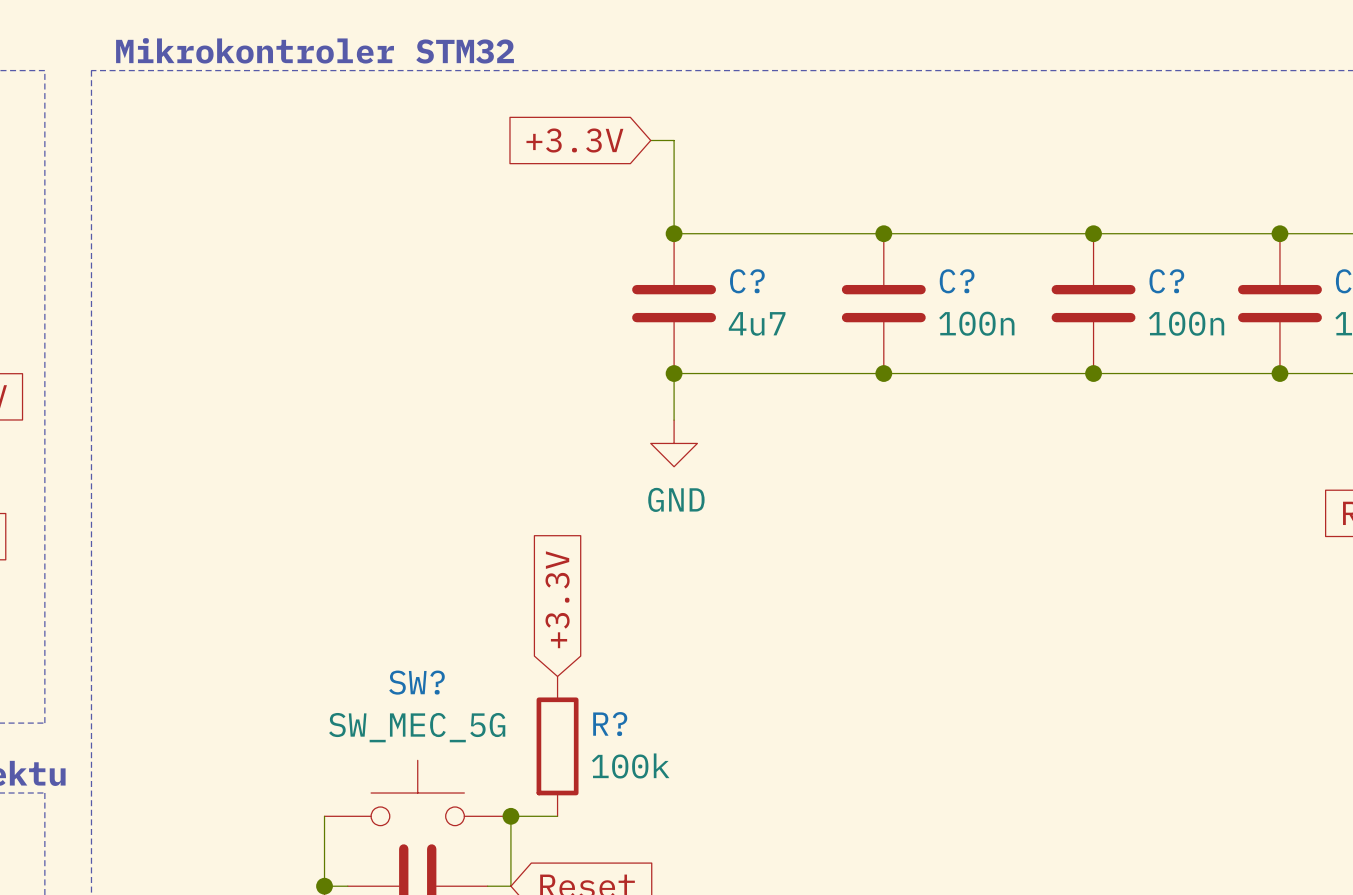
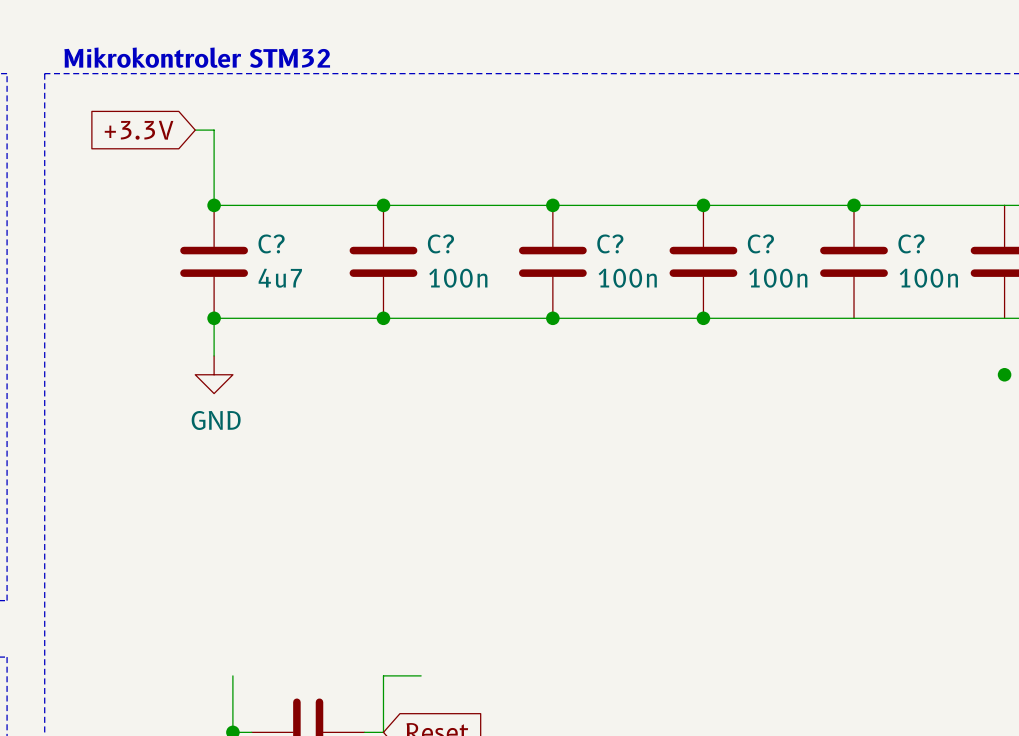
global label: none -> +3.3V (139, 130)
global label: +3.3V (574, 140) -> none
wire: (650, 140) (674, 140) (674, 233) -> (195, 130) (214, 130) (214, 205) (515, 205)
junction: none -> (214, 205)
junction: none -> (383, 205)
junction position: (674, 233) -> (552, 205)
junction position: (883, 233) -> (703, 205)
junction: (1279, 233) -> none
C?: none -> 100n (383, 261)
C? position: (674, 303) -> (214, 261)
C?: none -> 100n (552, 261)
C? position: (883, 303) -> (703, 261)
junction: none -> (214, 318)
junction: none -> (383, 318)
wire: (674, 373) (674, 420) -> (515, 318) (214, 318) (214, 355)
junction position: (674, 373) -> (552, 318)
junction position: (883, 373) -> (703, 318)
junction: (1093, 373) -> none
junction position: (1279, 373) -> (1004, 374)
power symbol position: GND (674, 443) -> GND (214, 374)
global label: +3.3V (557, 599) -> none
R?: 100k (557, 746) -> none
SW?: SW_MEC_5G (417, 793) -> none
junction: (510, 816) -> none

